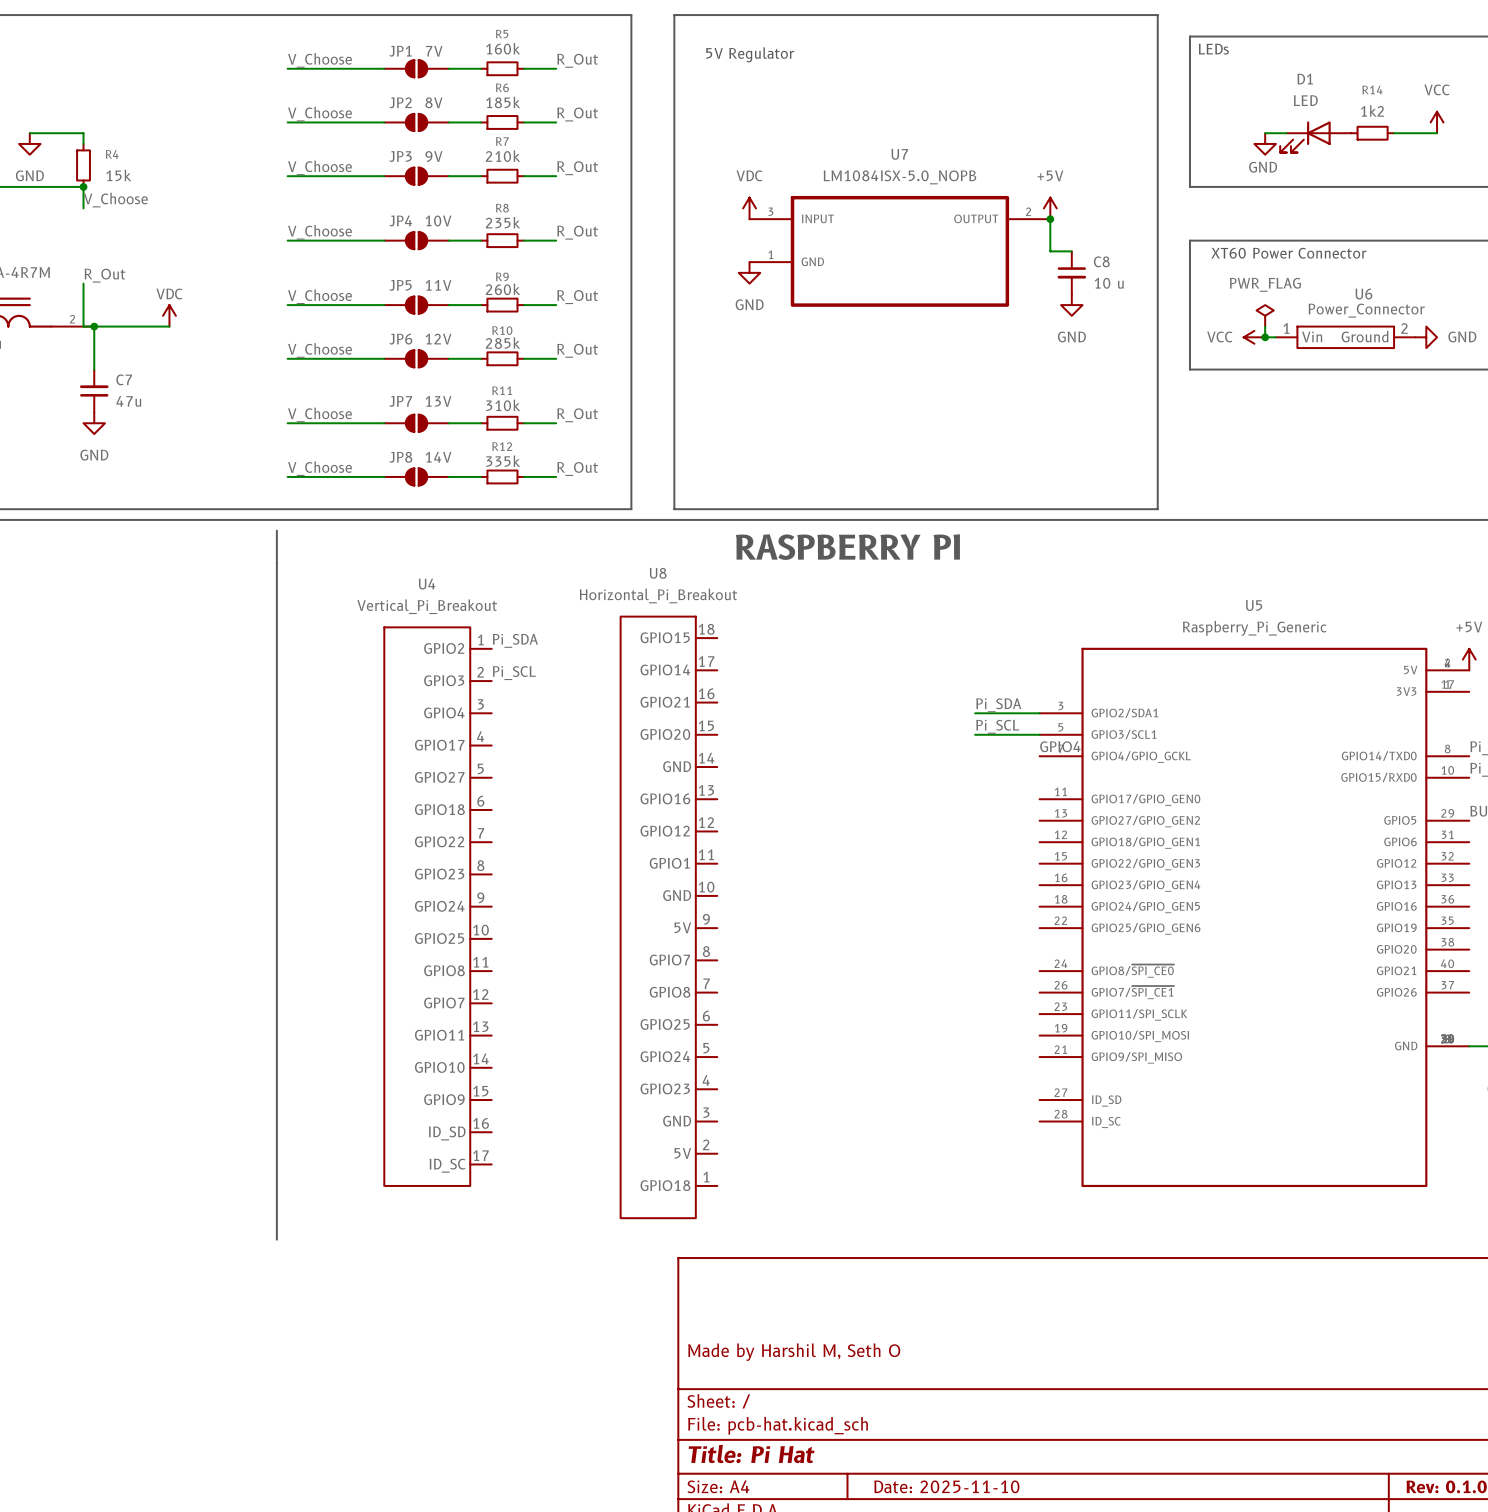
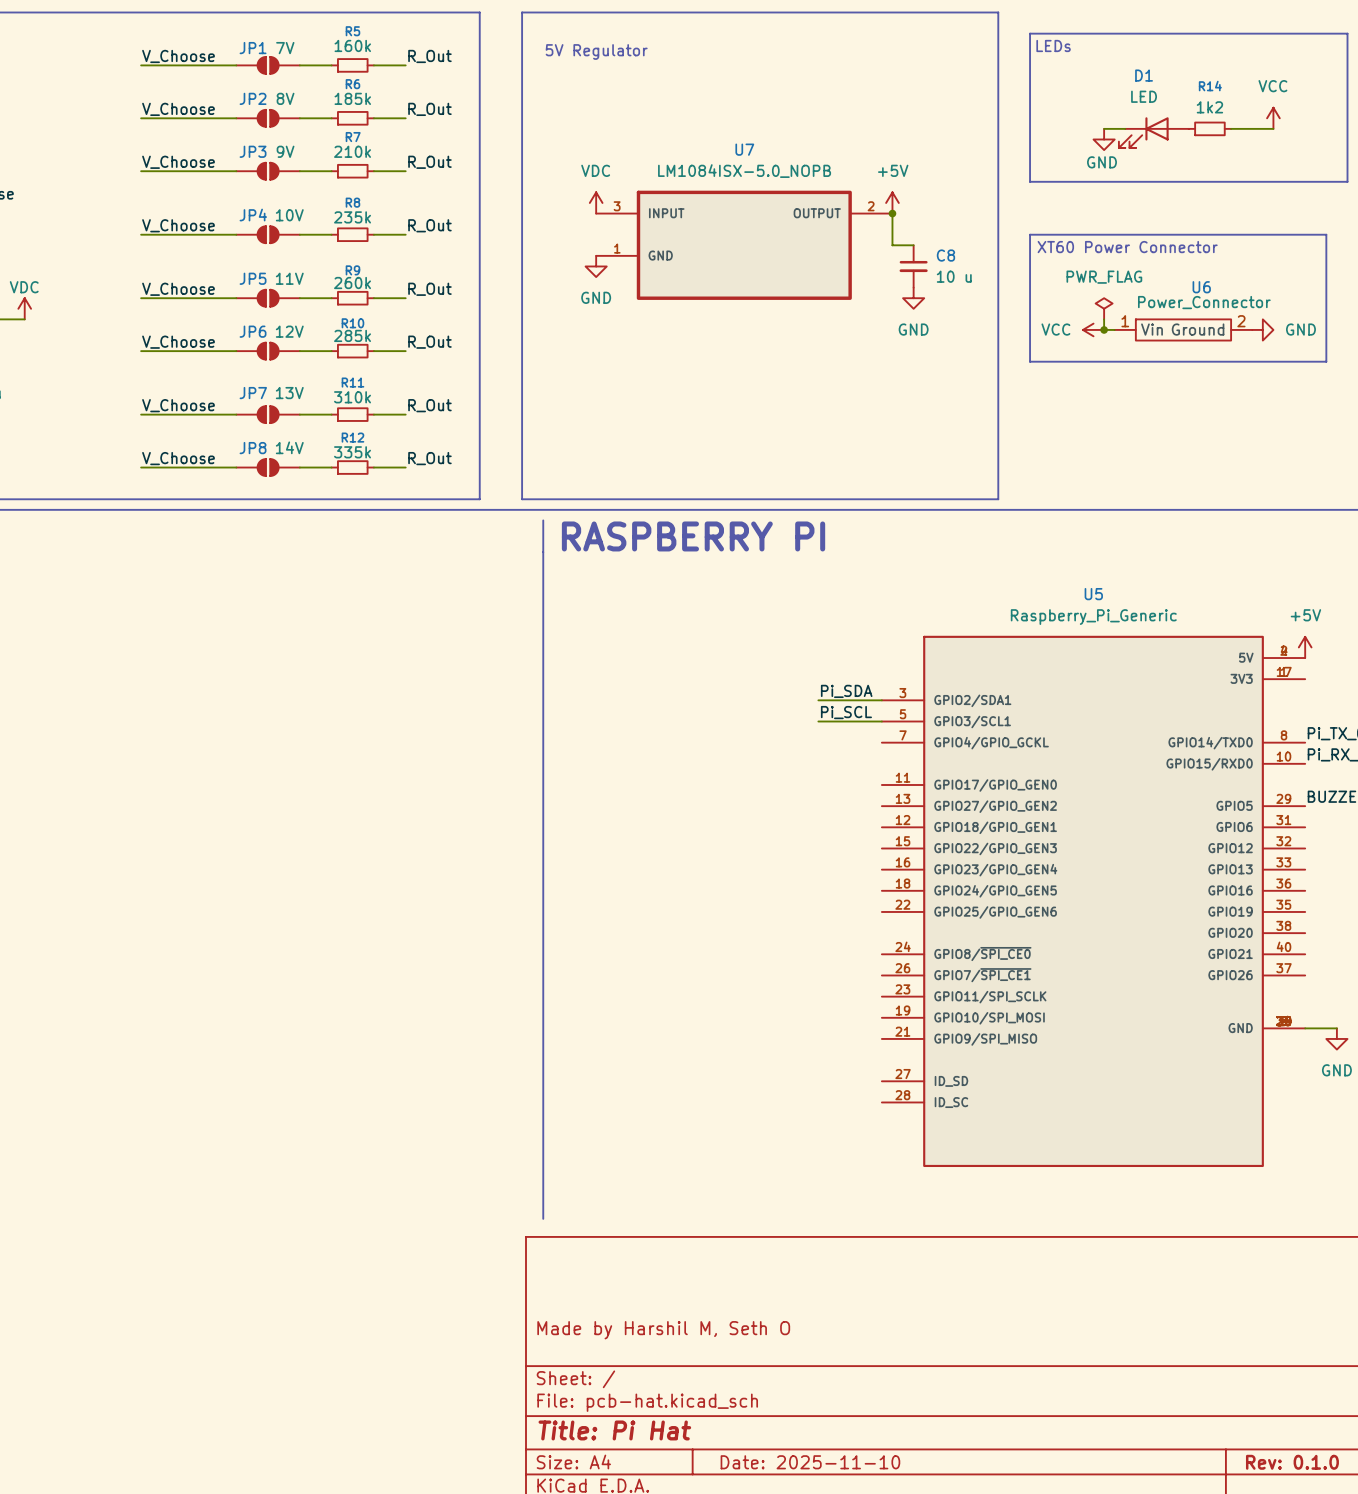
line: (276, 530) (276, 1239) -> none
line: none -> (543, 520) (543, 1218)
label: Pi_SDA (515, 640) -> none
label: Pi_SCL (514, 673) -> none
label: GPIO4 (1060, 746) -> none
U4: Vertical_Pi_Breakout (438, 906) -> none
U8: Horizontal_Pi_Breakout (668, 917) -> none

